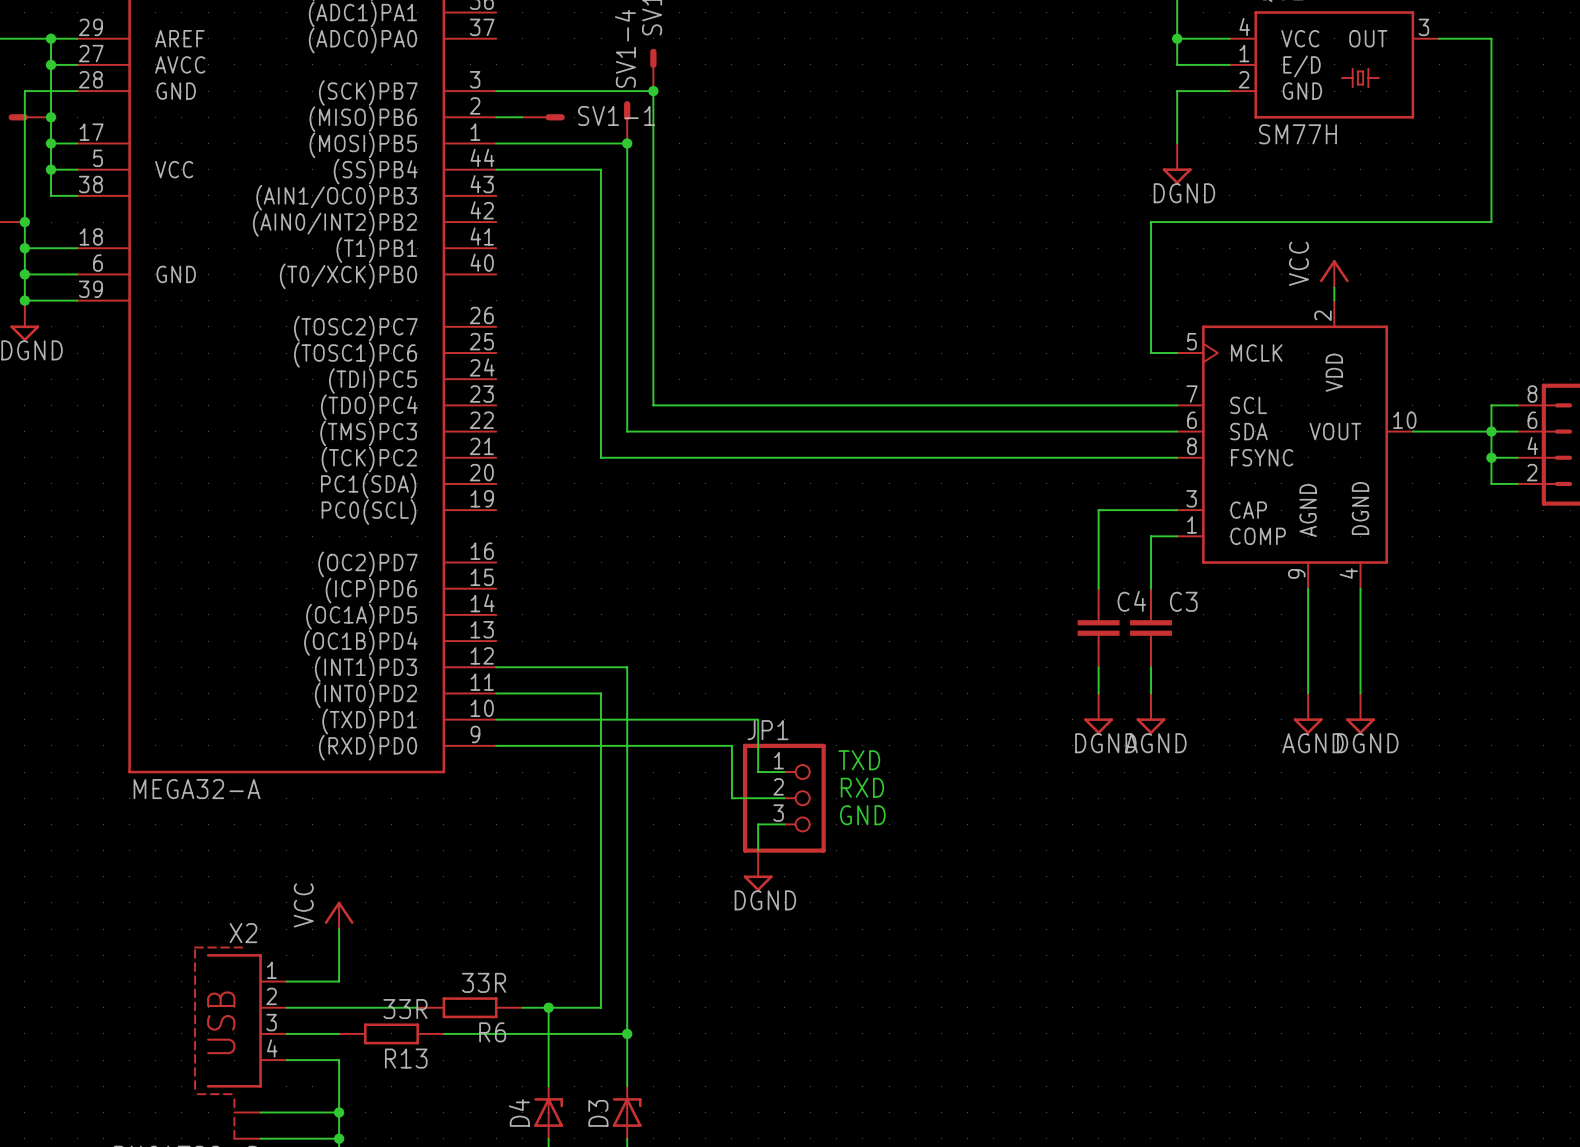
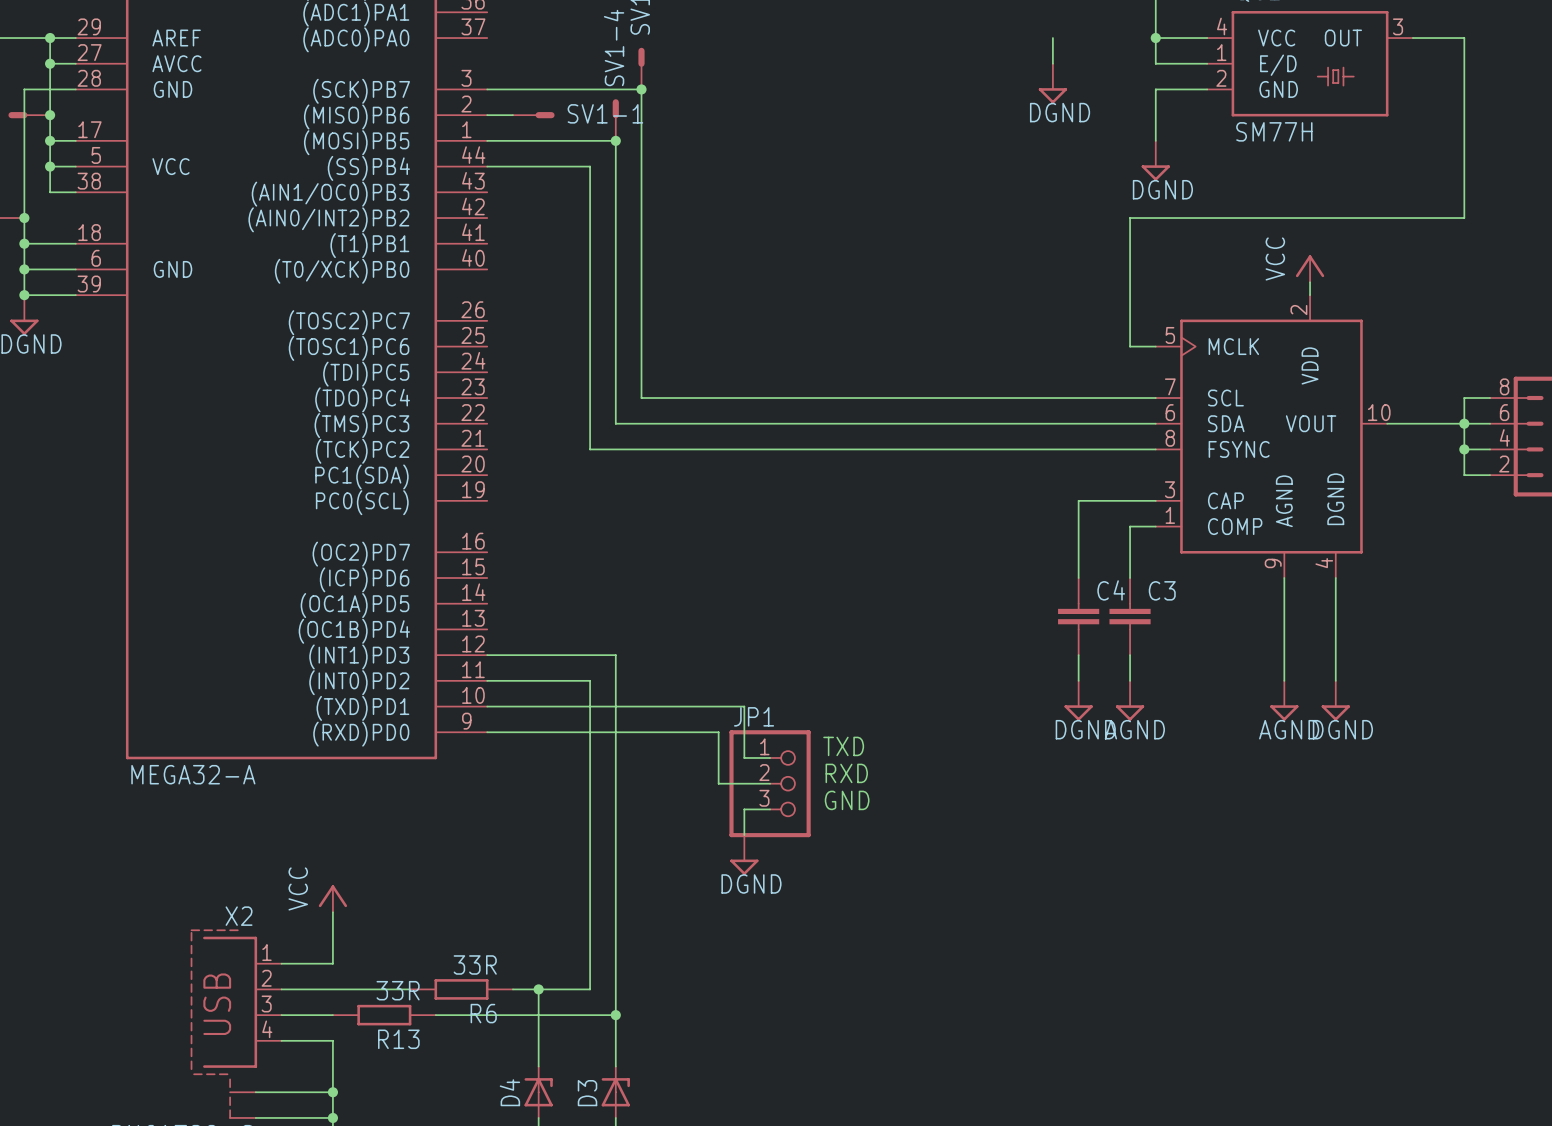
wire: none -> (1052, 38) (1052, 63)
power symbol: none -> DGND (1052, 83)

